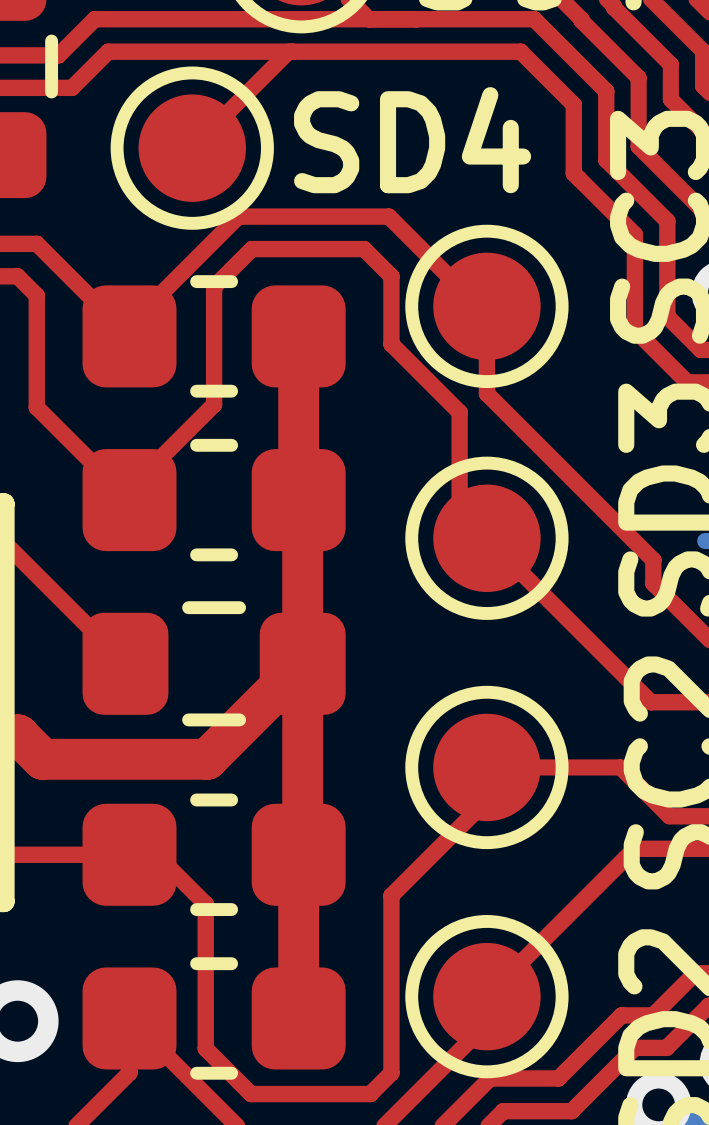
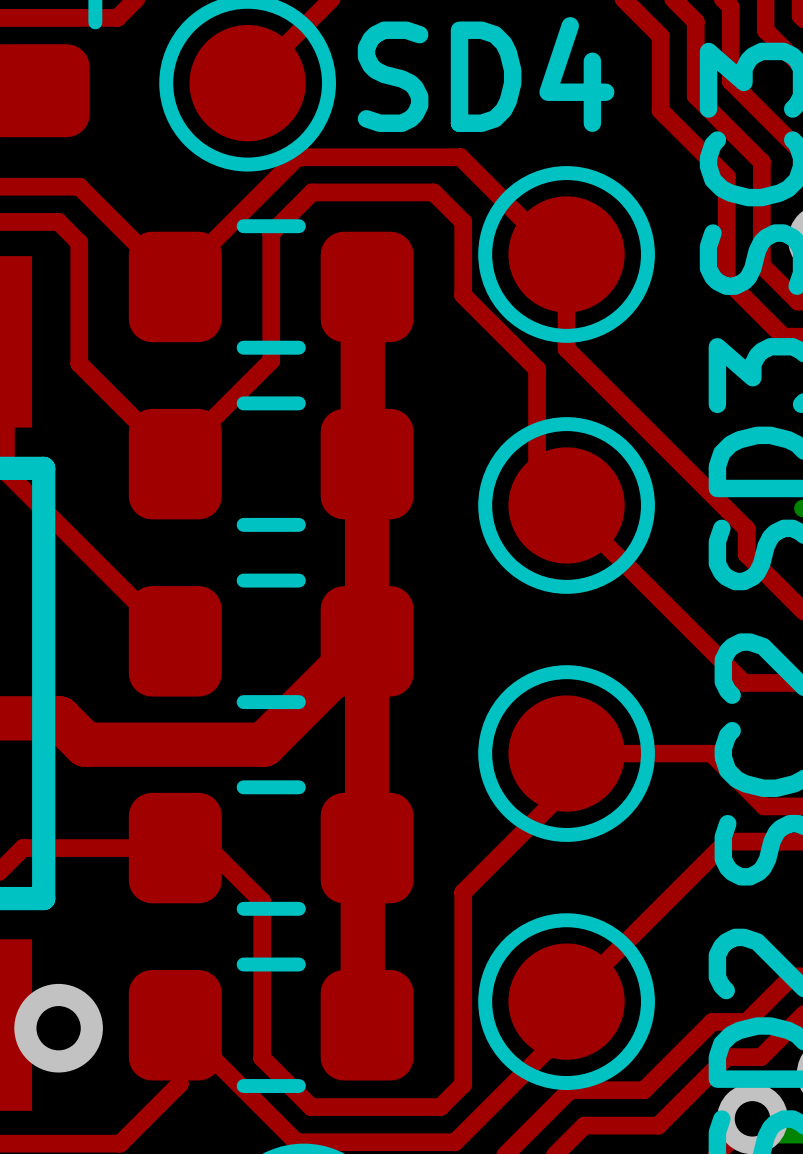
part footprint: [82, 275, 346, 398] -> [128, 219, 414, 355]
part footprint: [82, 438, 346, 562] -> [128, 396, 414, 532]
part footprint: [82, 793, 346, 916] -> [128, 780, 414, 916]
part footprint: [82, 957, 346, 1080] -> [128, 957, 414, 1093]

